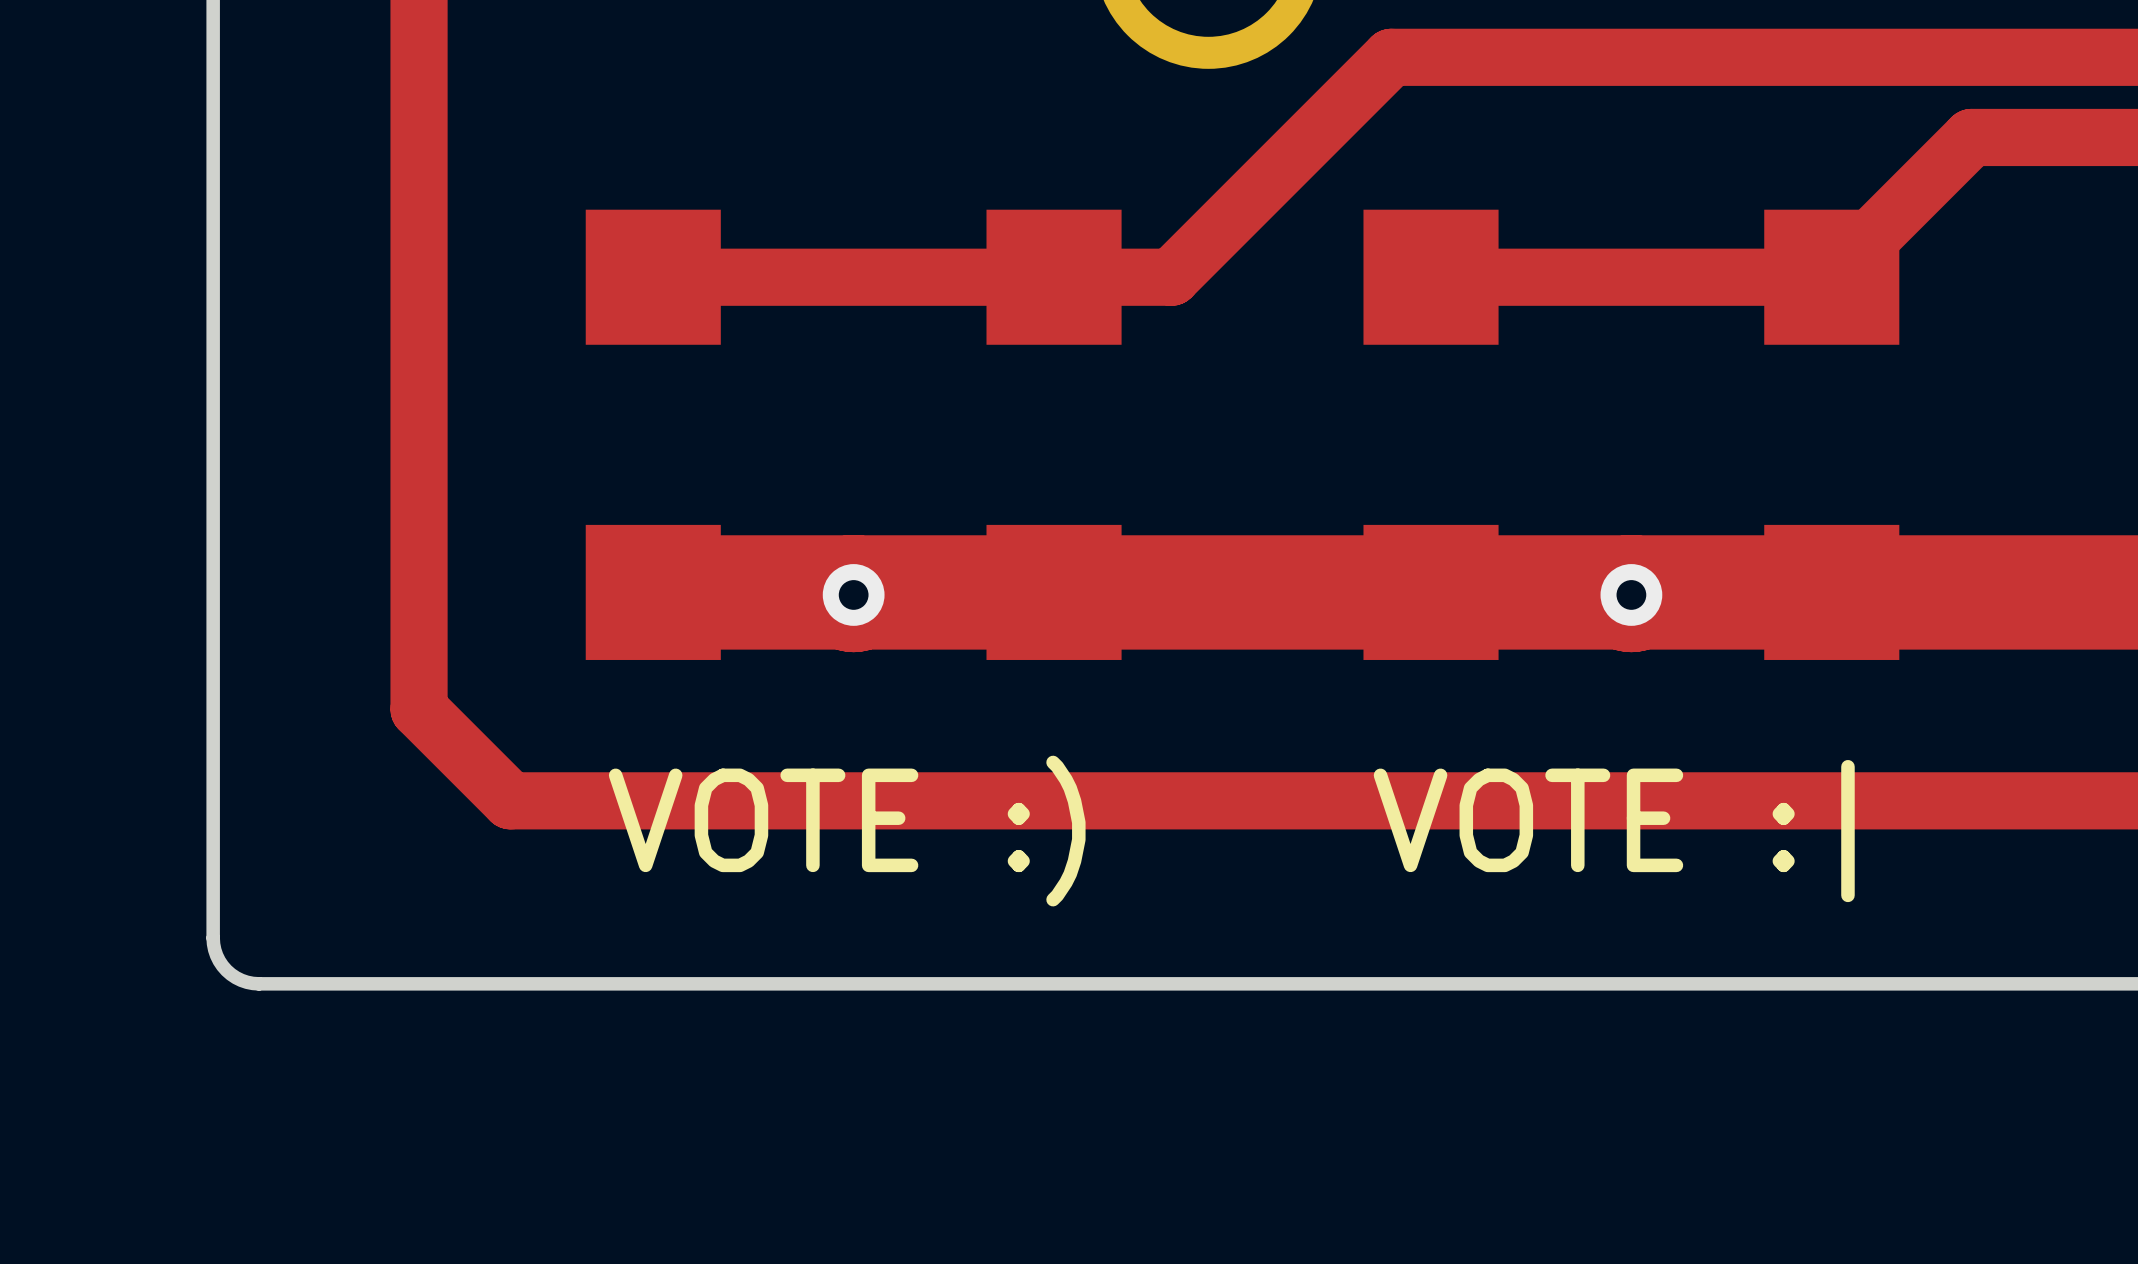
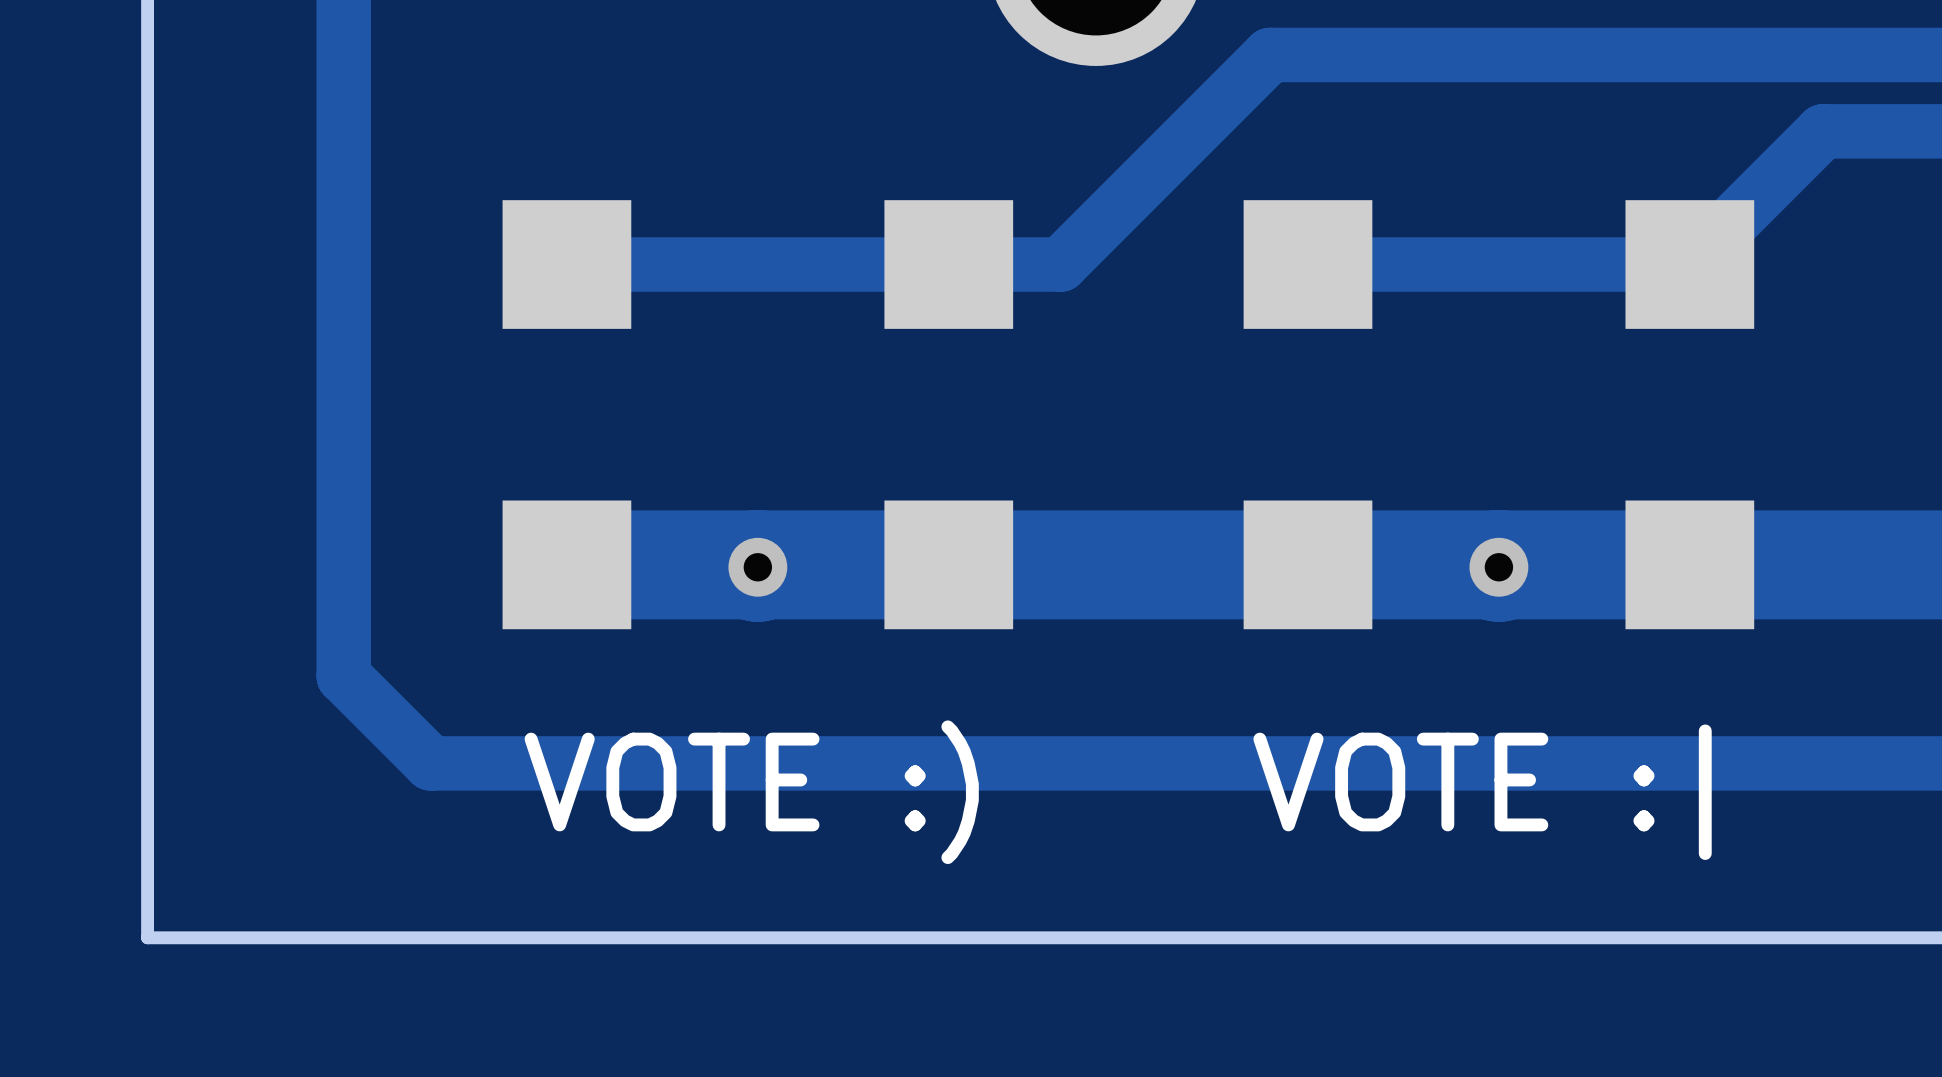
board edge: (213, 938) (216, 955) (226, 970) (241, 980) (258, 983) -> (147, 894) (147, 937) (191, 937)

